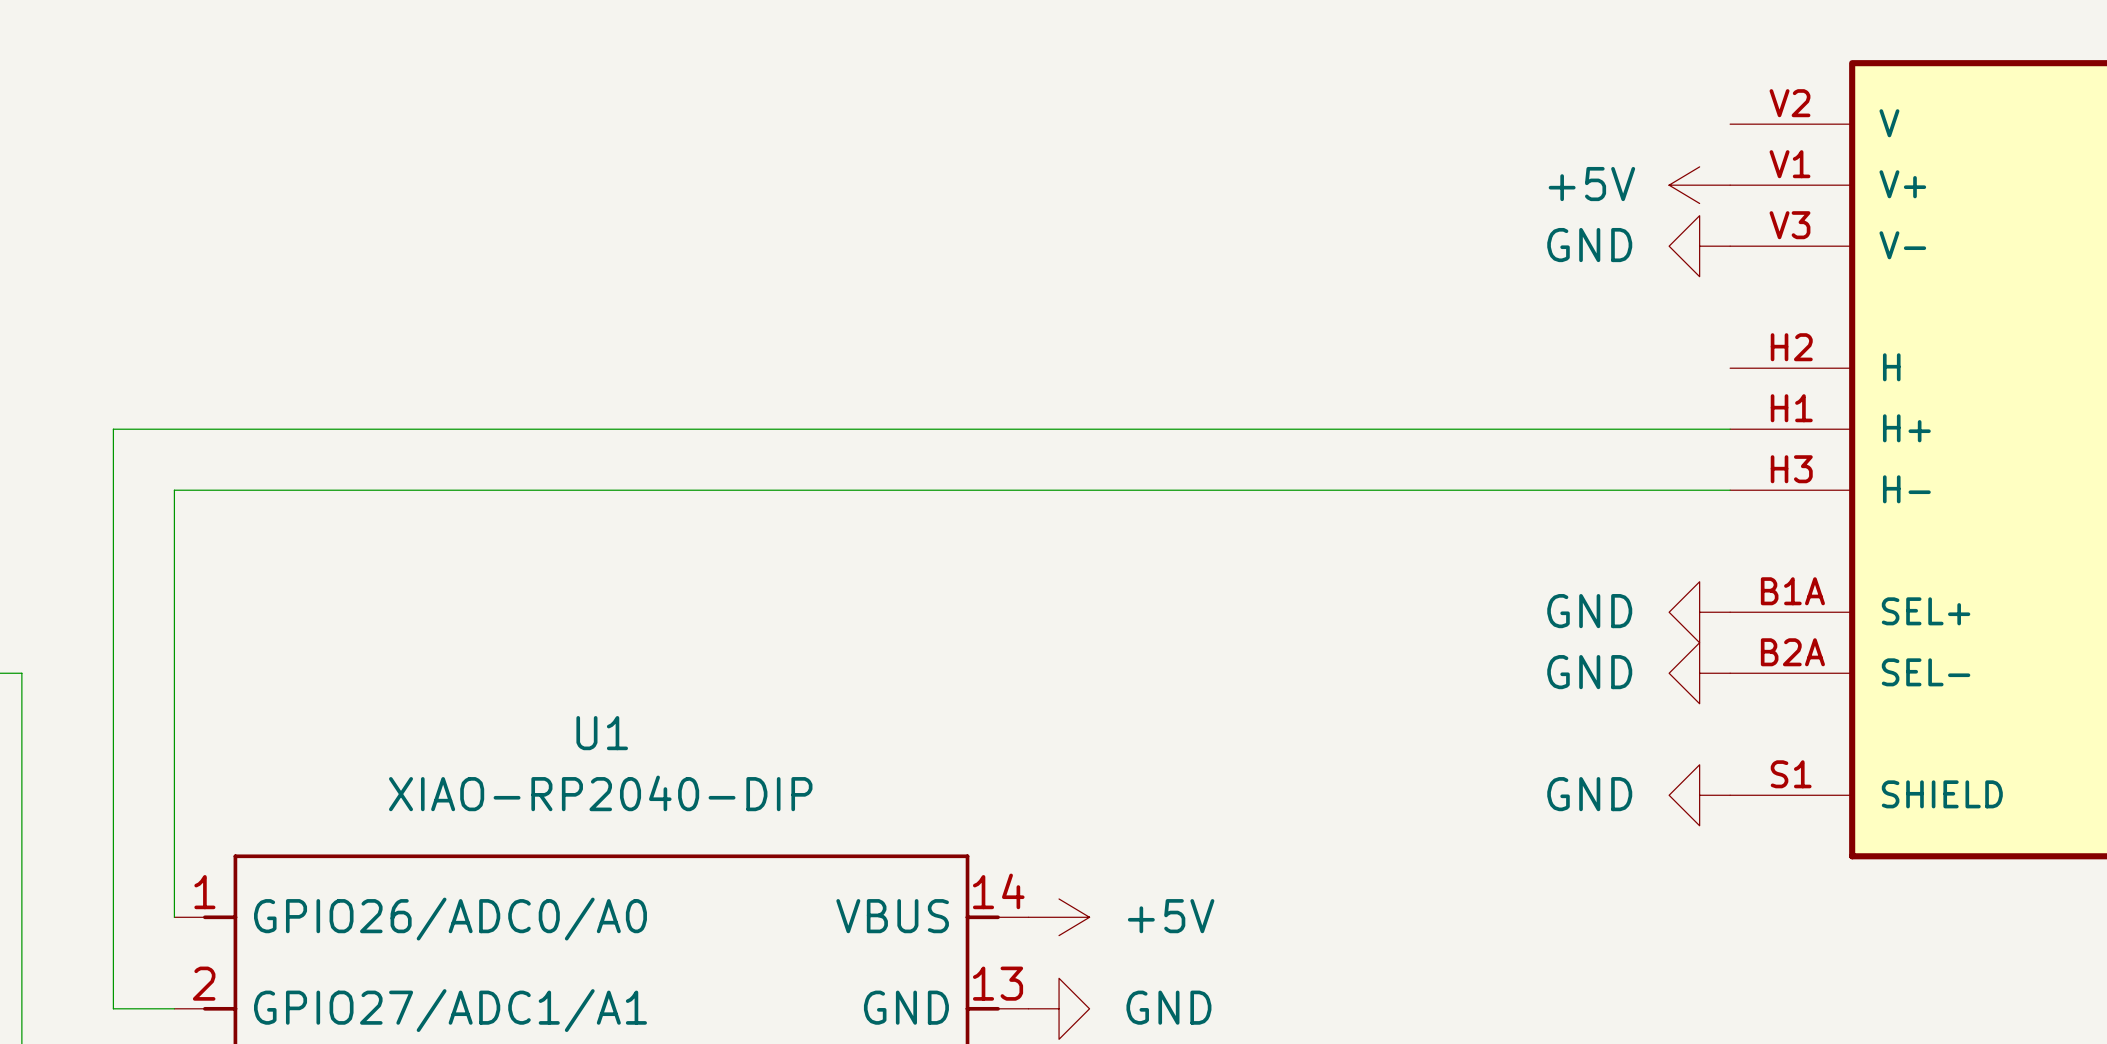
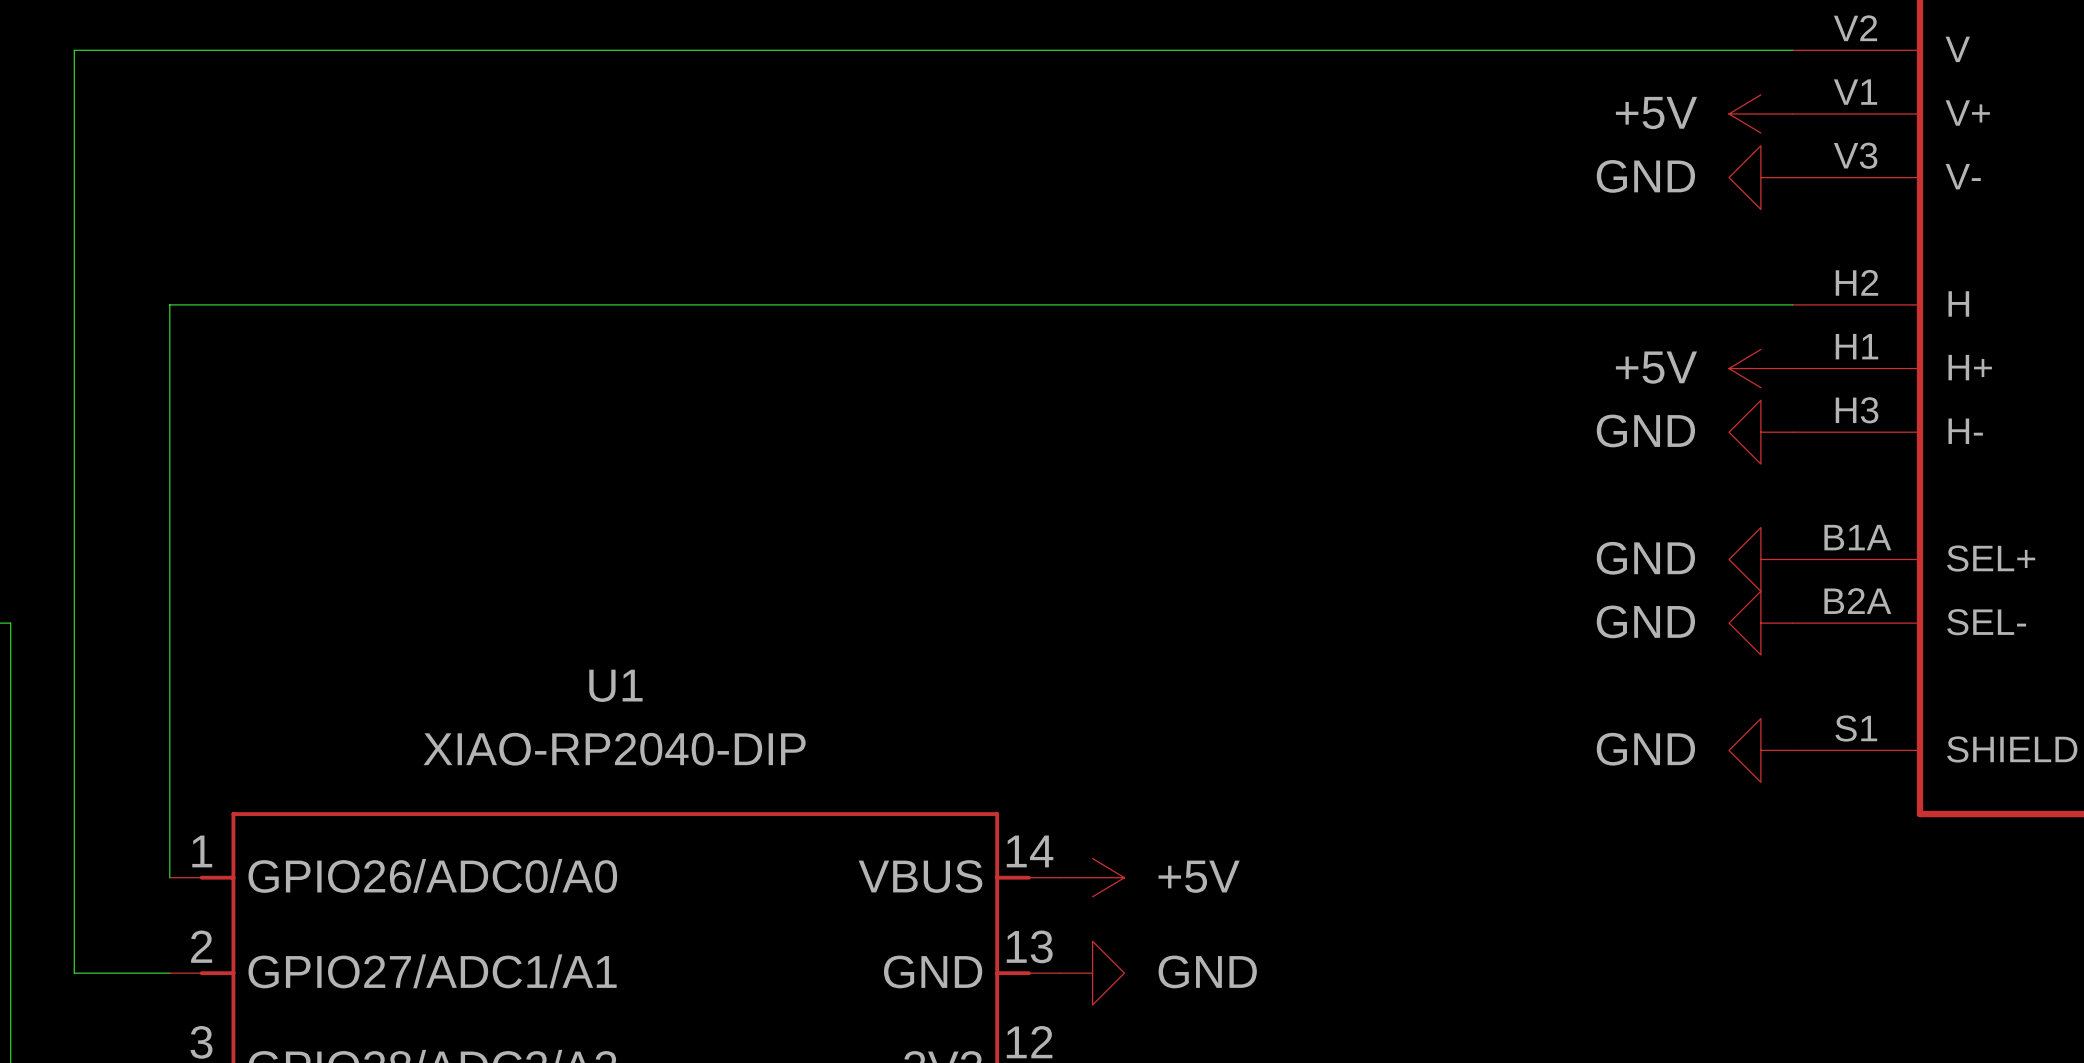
power symbol: none -> +5V (1760, 368)
wire: (1730, 429) (113, 429) (113, 1008) -> (1792, 50) (74, 50) (74, 973) (106, 973)
wire: (174, 490) (1730, 490) -> (169, 432) (169, 304) (1792, 304)
power symbol: none -> GND (1760, 432)

